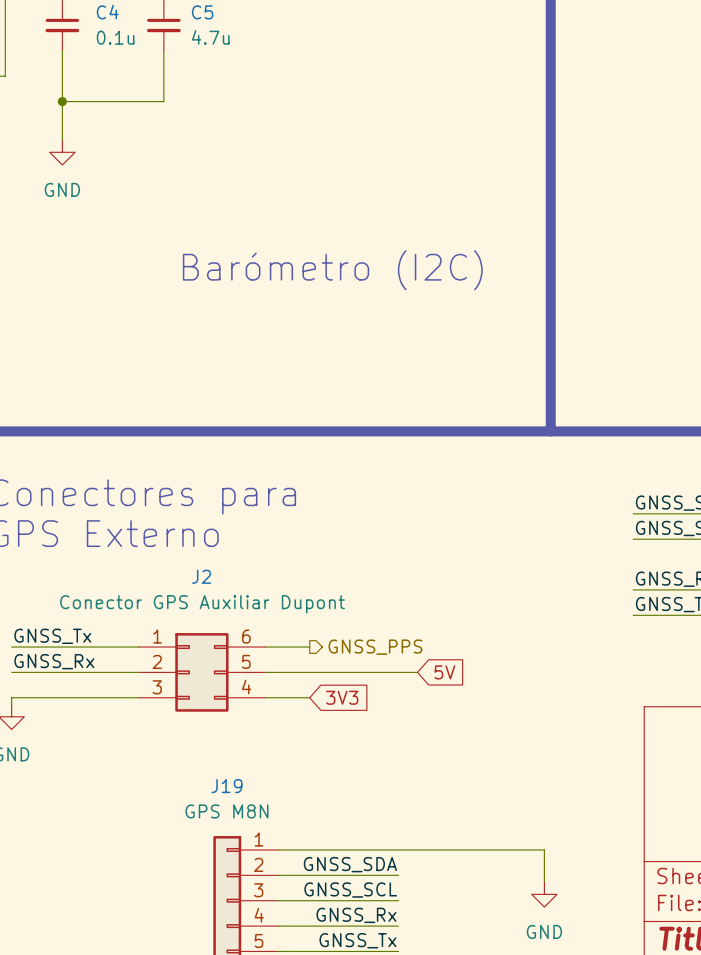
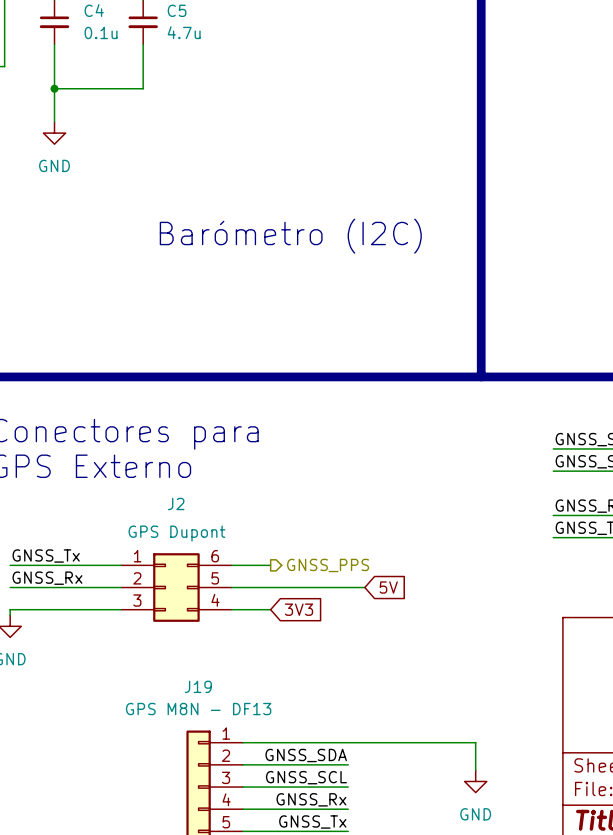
J2 value: Conector GPS Auxiliar Dupont (202, 604) -> GPS Dupont (176, 533)
J19 value: GPS M8N (226, 811) -> GPS M8N - DF13 (198, 709)

